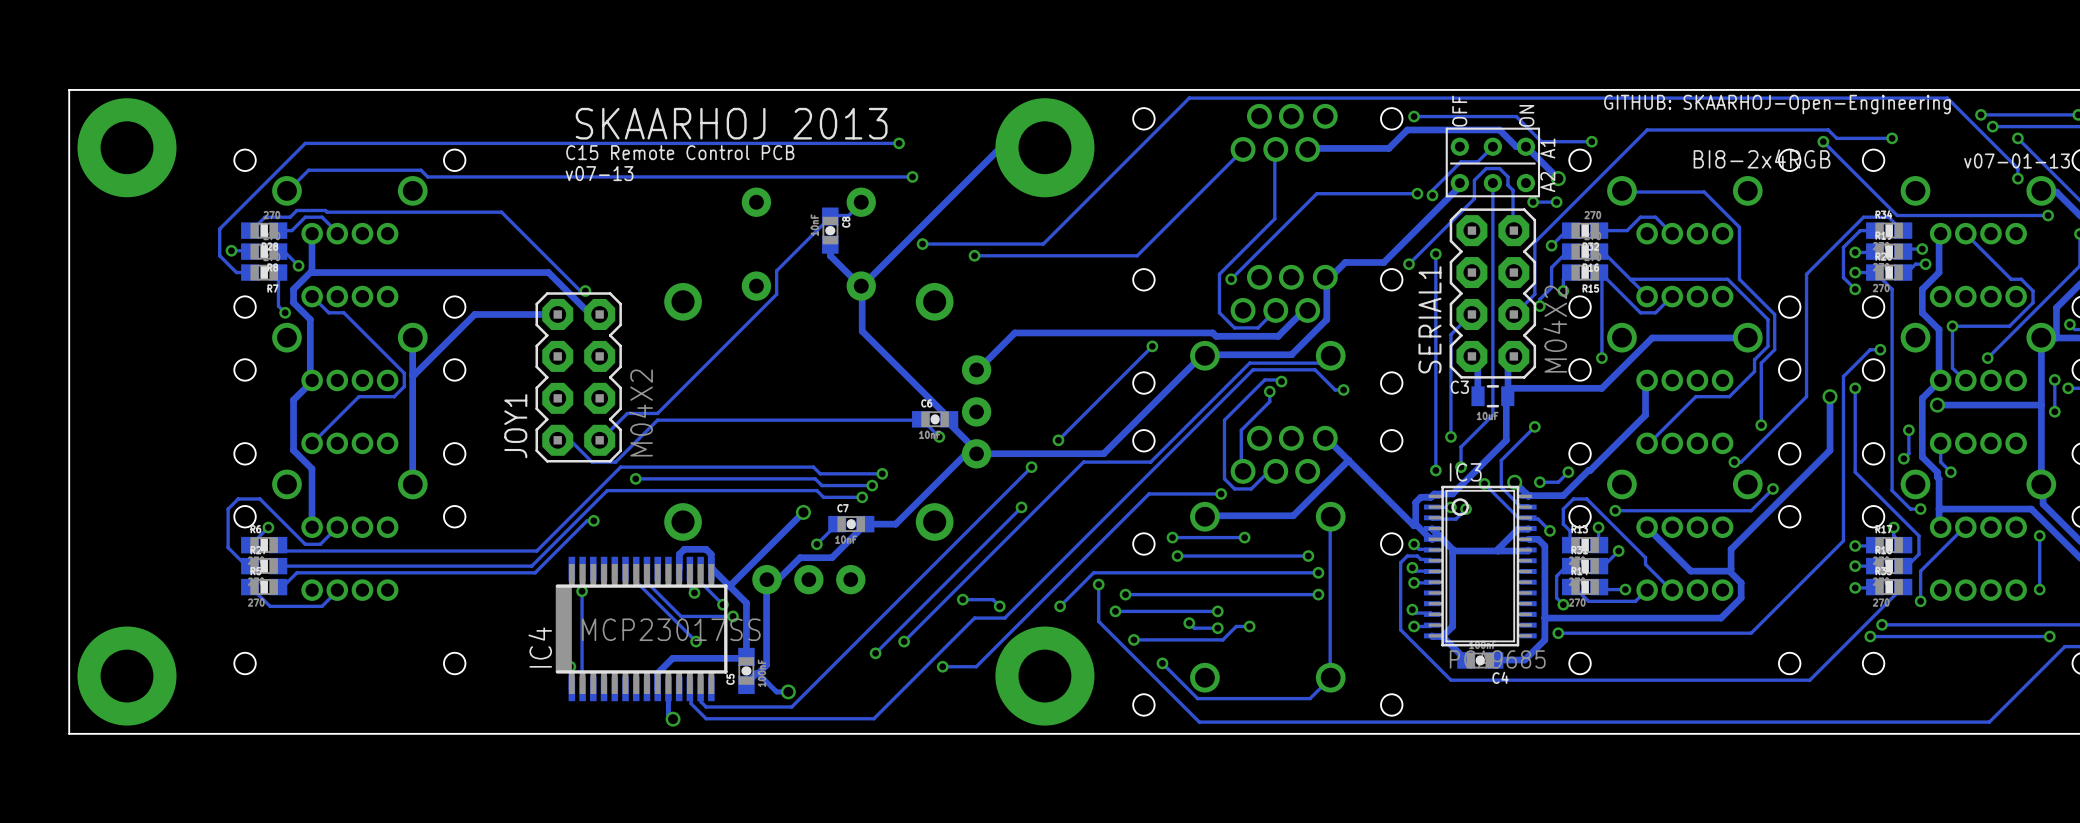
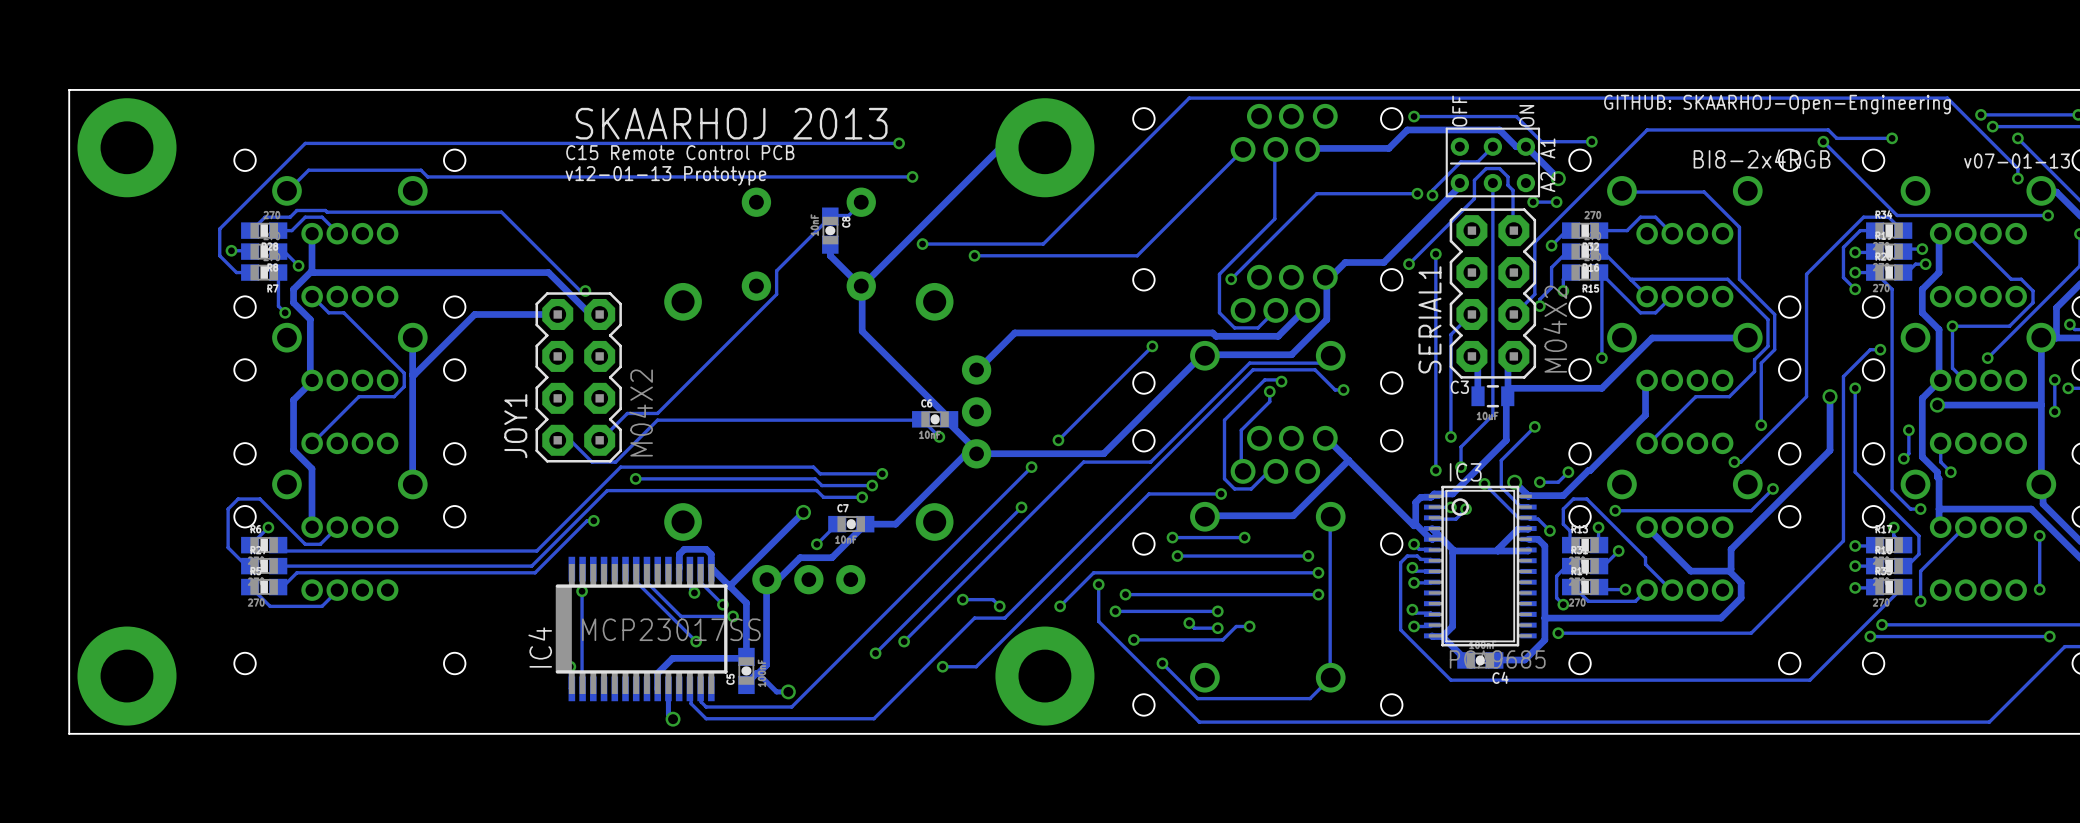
text: v07-13 (599, 173) -> v12-01-13 Prototype (665, 175)

